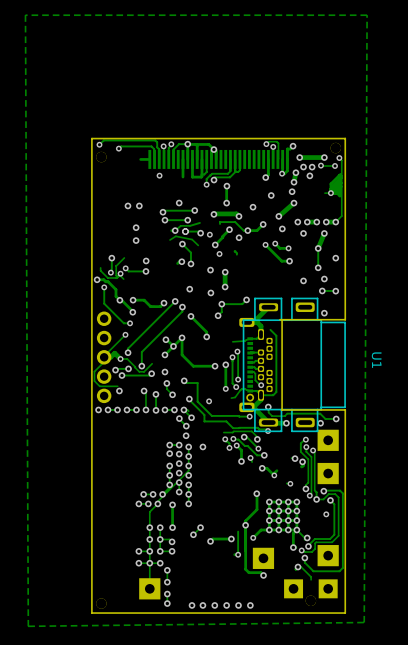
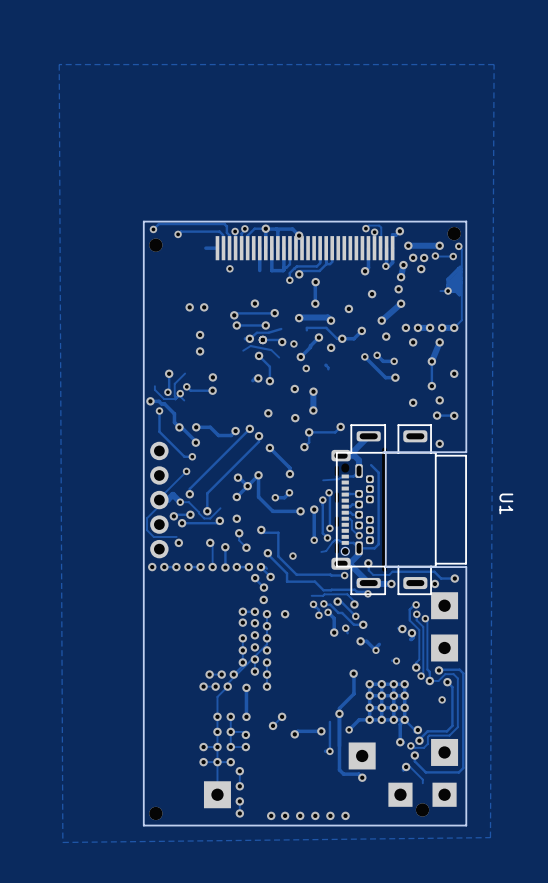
track: none -> (289, 492) (284, 497) (275, 497)
via: none -> (289, 492)
via: none -> (275, 497)

